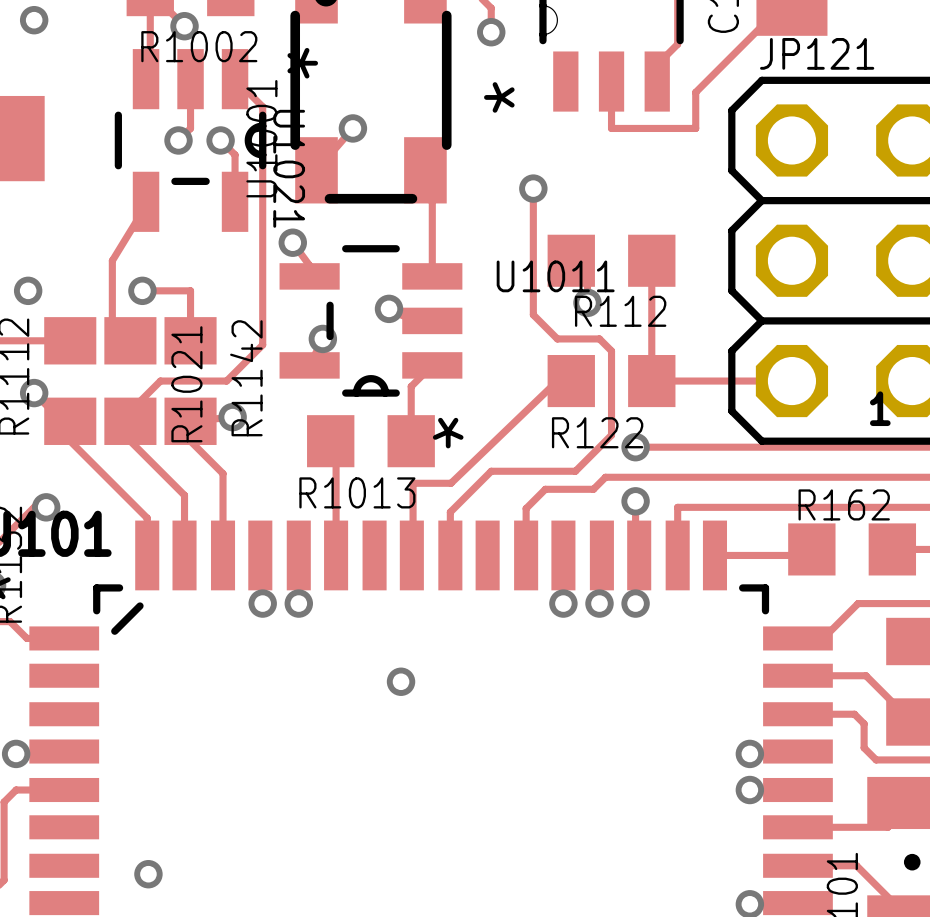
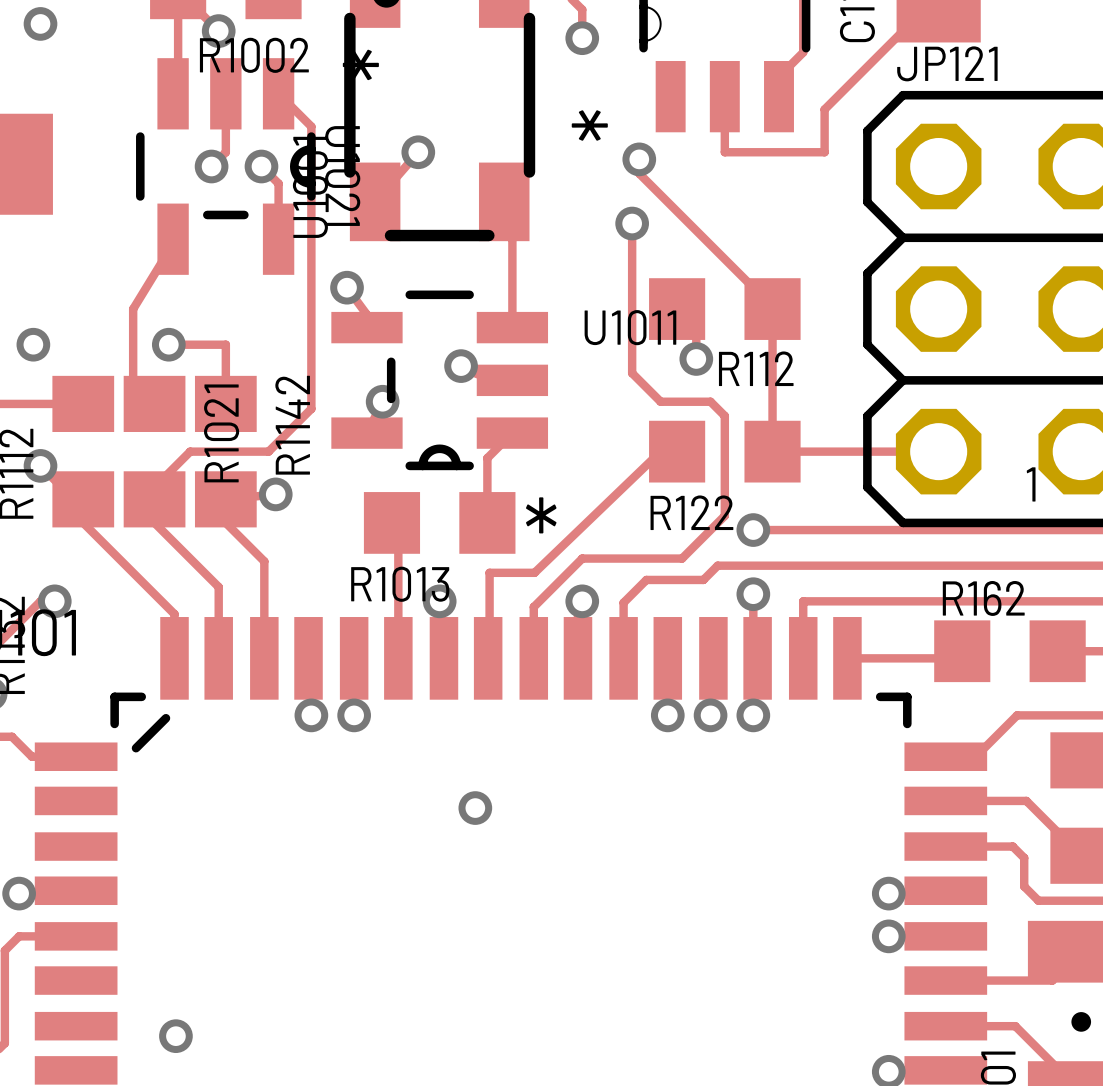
track: none -> (639, 159) (639, 173) (772, 306) (772, 309)
via: none -> (639, 159)
via: none -> (439, 601)
via: none -> (582, 601)

